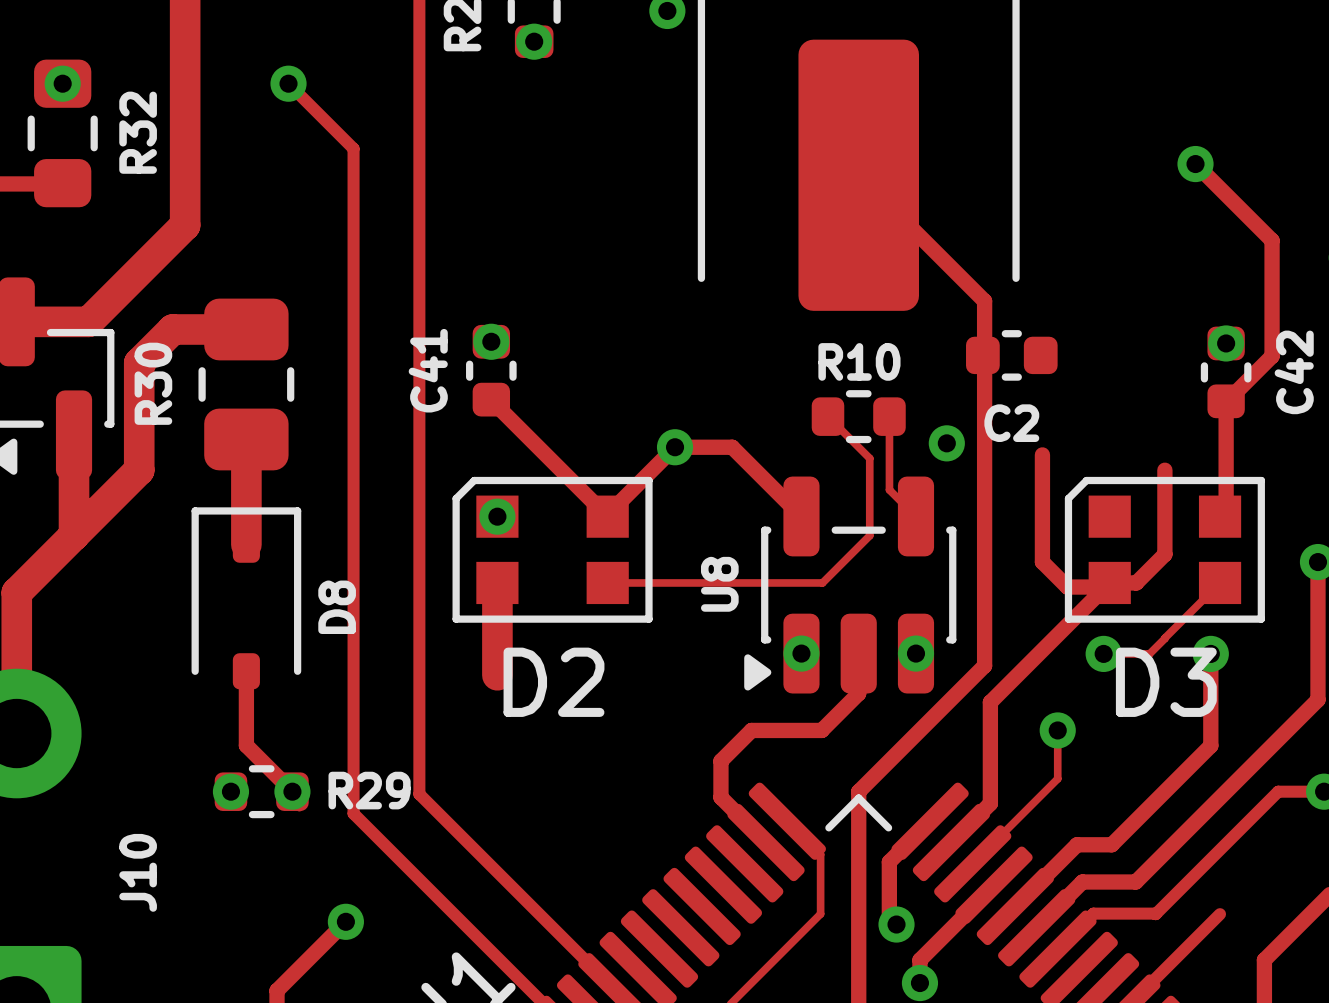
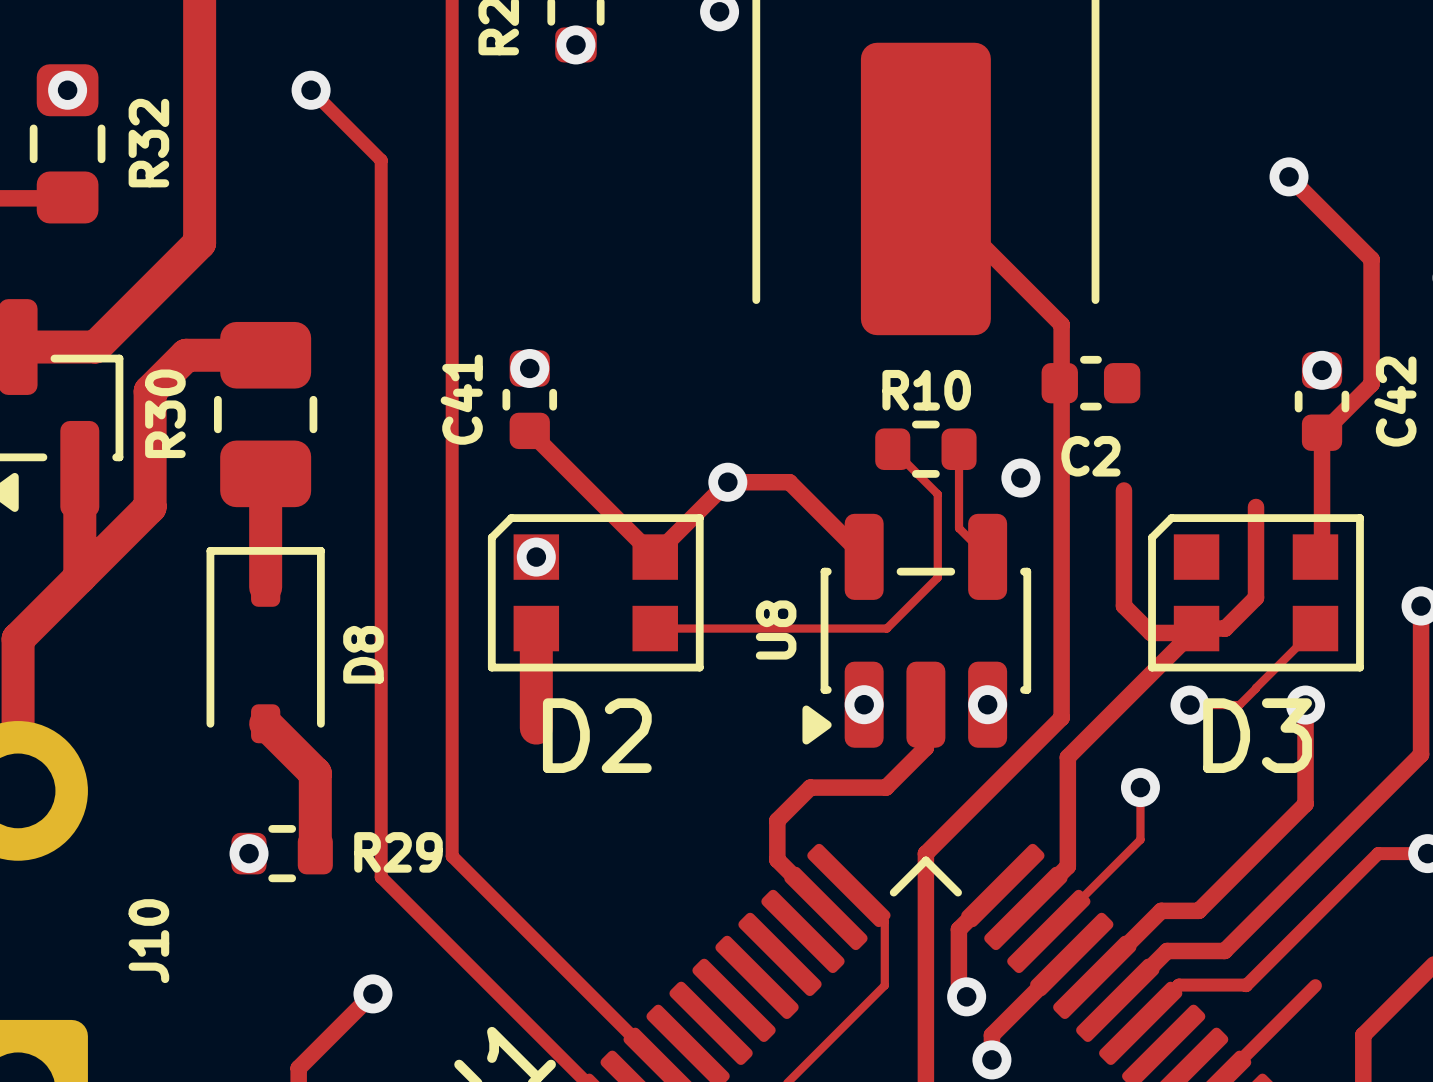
track: (246, 671) (246, 745) (292, 791) (292, 800) (299, 807) -> (265, 723) (315, 773) (315, 853)
via: (292, 791) -> none

